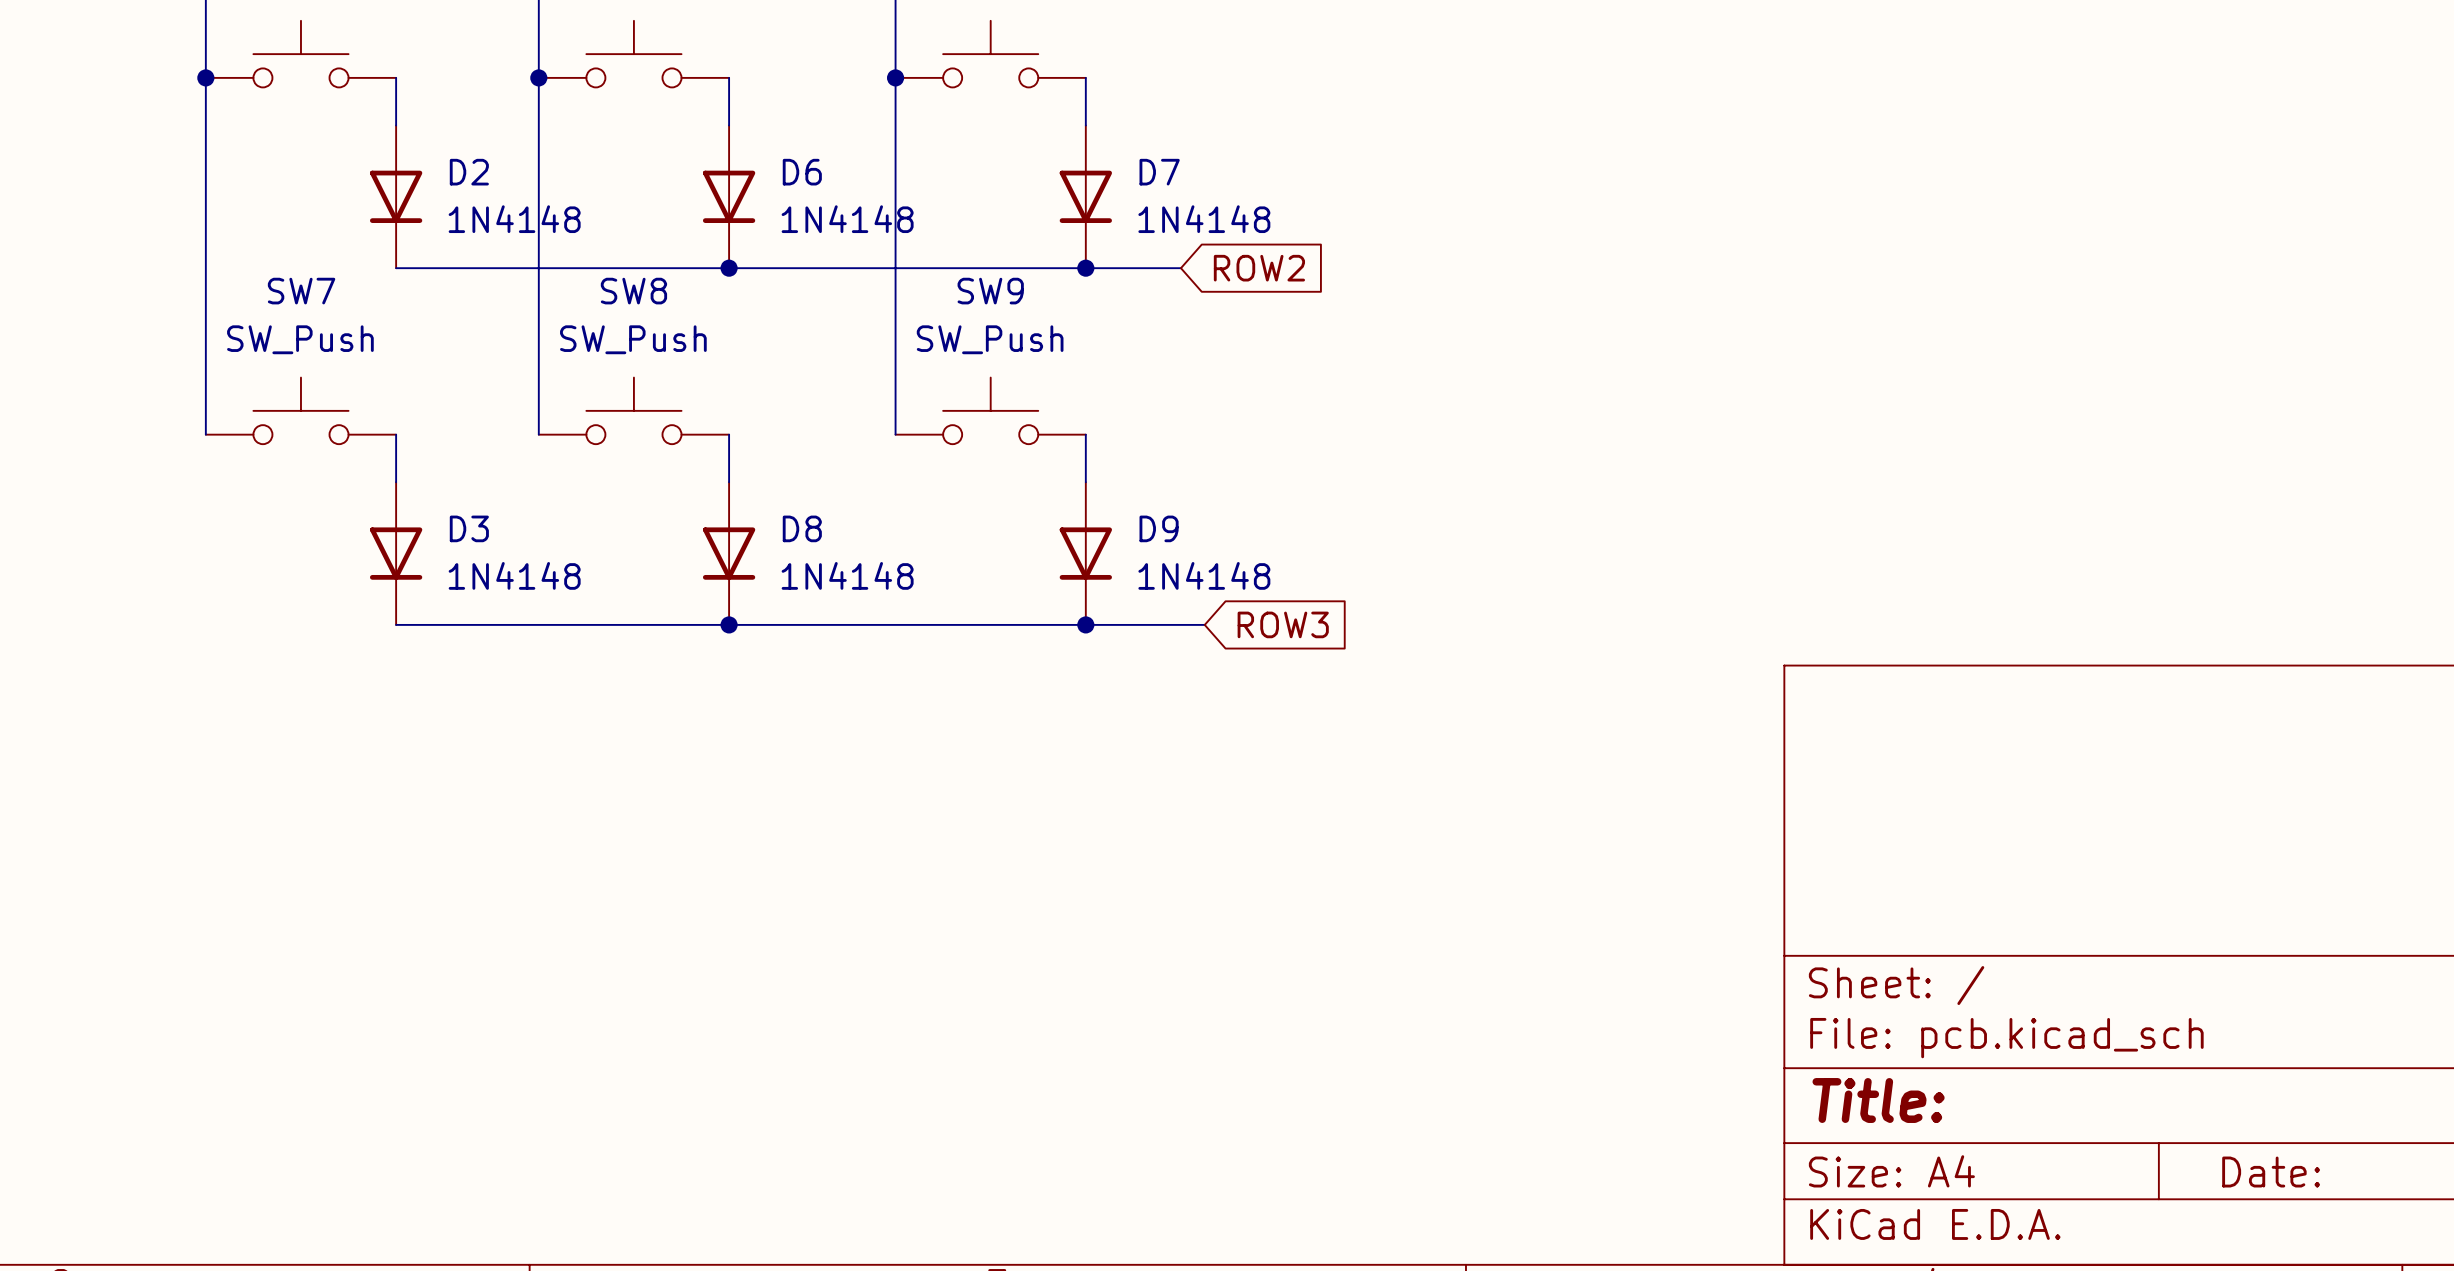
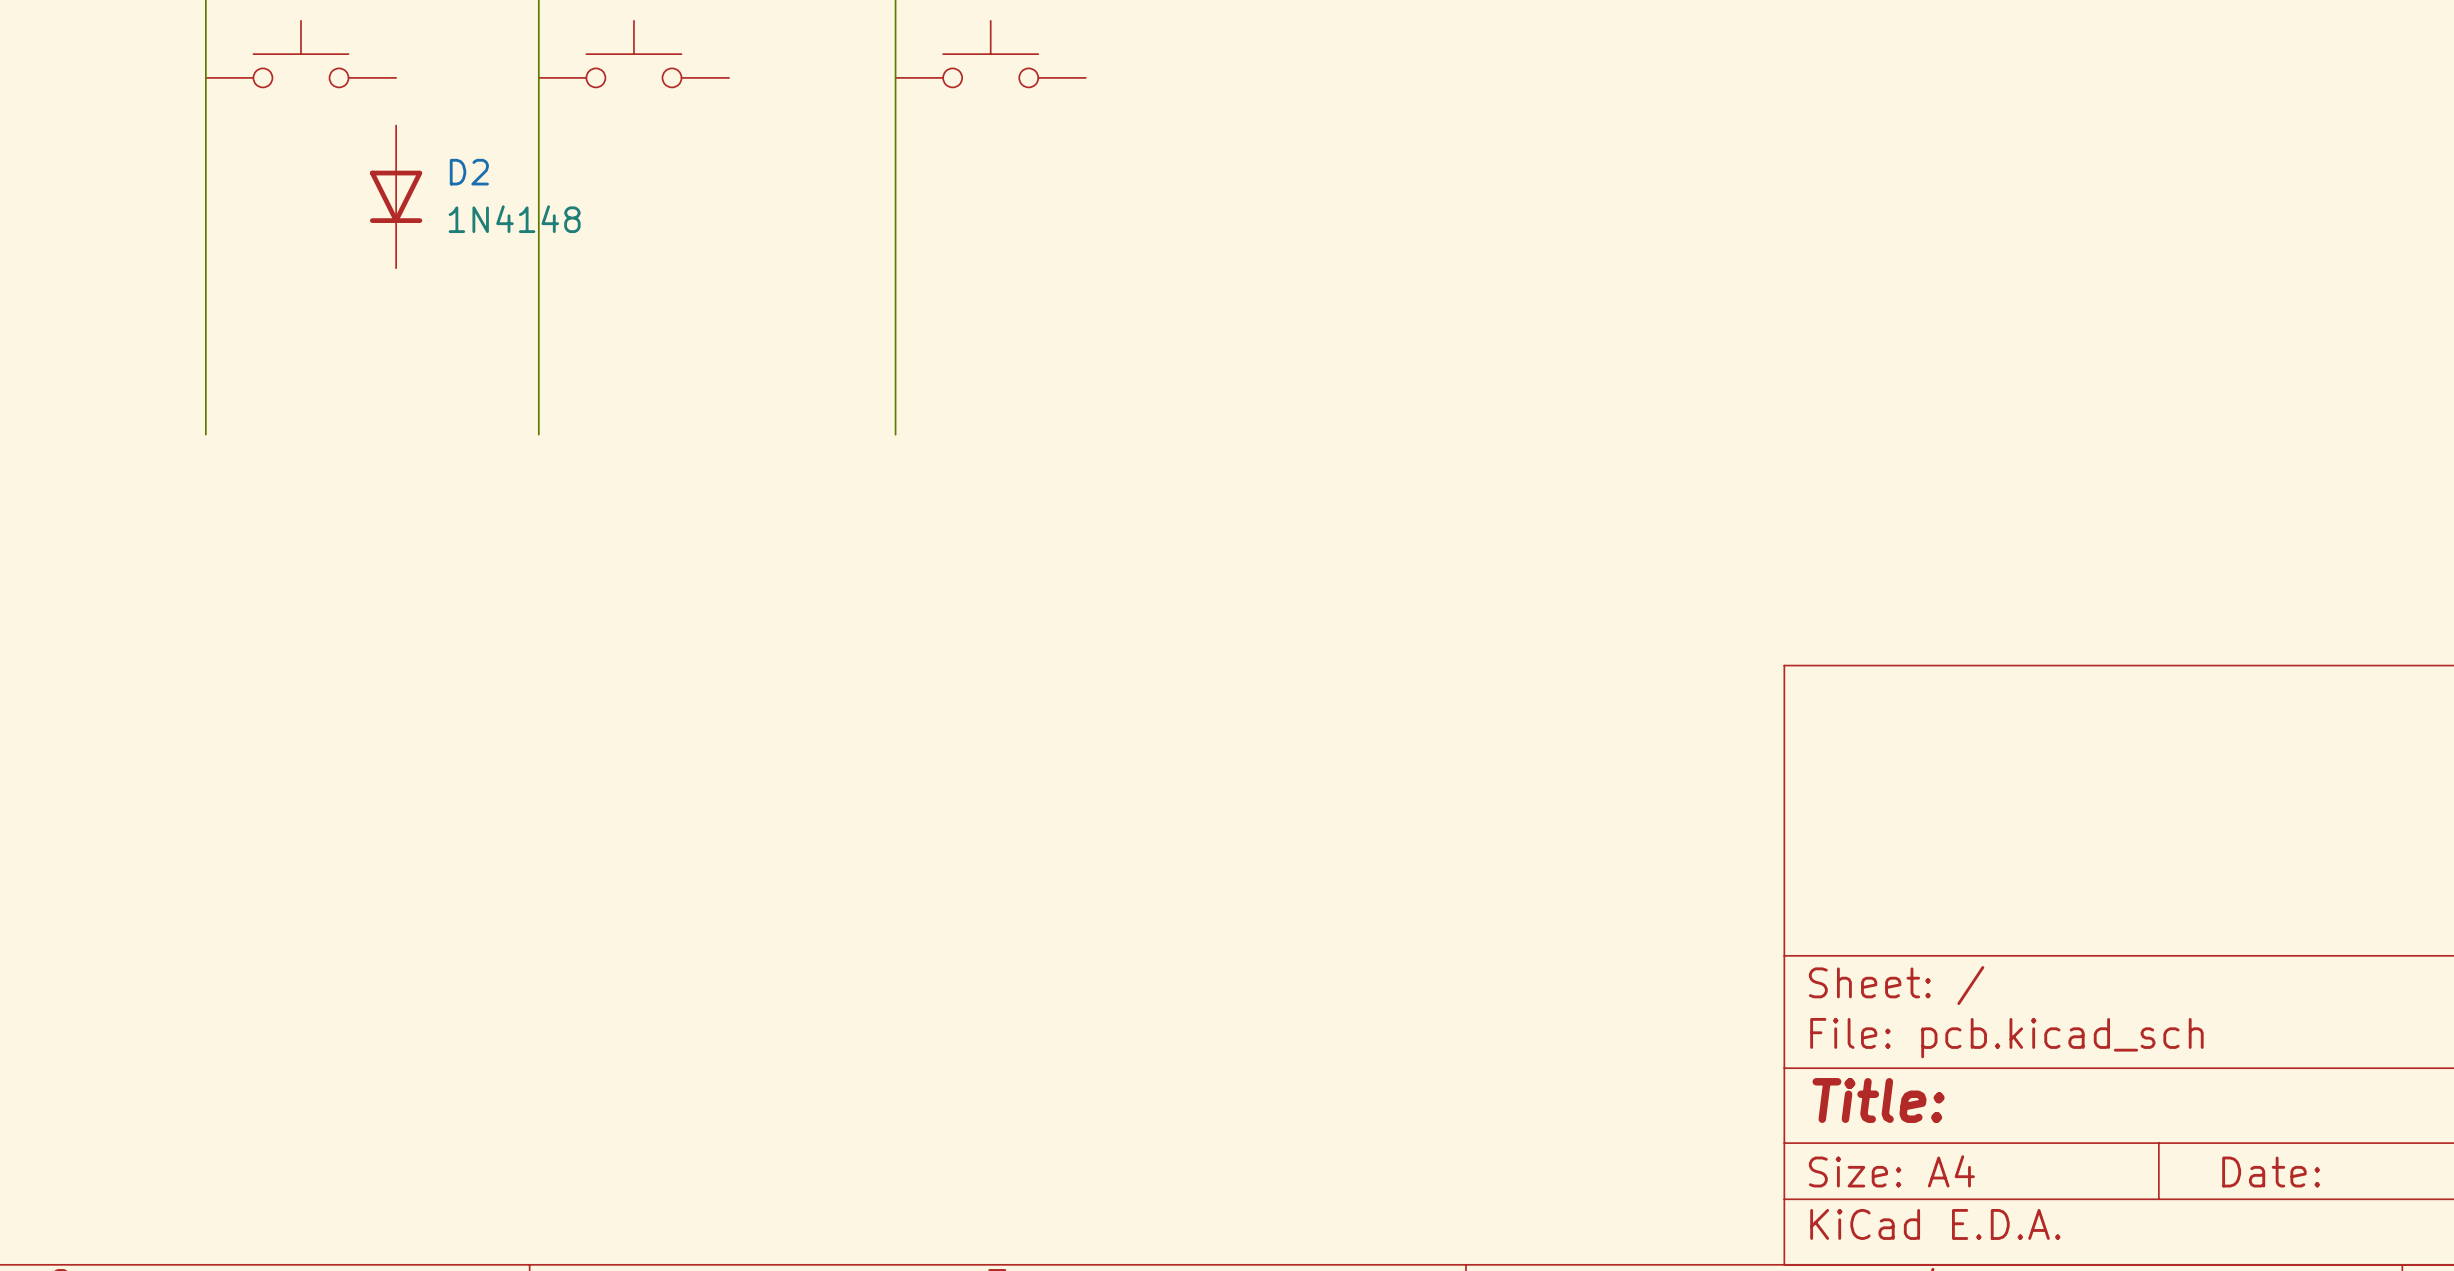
junction: (205, 77) -> none
wire: (396, 77) (396, 125) -> none
junction: (538, 77) -> none
wire: (729, 77) (729, 125) -> none
junction: (895, 77) -> none
wire: (1085, 77) (1085, 125) -> none
D6: 1N4148 (729, 196) -> none
D7: 1N4148 (1085, 196) -> none
wire: (396, 268) (1180, 268) -> none
junction: (729, 268) -> none
junction: (1085, 268) -> none
global label: ROW2 (1259, 268) -> none
SW7: SW_Push (300, 410) -> none
SW8: SW_Push (633, 410) -> none
SW9: SW_Push (990, 410) -> none
wire: (396, 434) (396, 482) -> none
wire: (729, 434) (729, 482) -> none
wire: (1085, 434) (1085, 482) -> none
D3: 1N4148 (396, 553) -> none
D8: 1N4148 (729, 553) -> none
D9: 1N4148 (1085, 553) -> none
wire: (396, 624) (1204, 624) -> none
junction: (729, 624) -> none
junction: (1085, 624) -> none
global label: ROW3 (1283, 624) -> none

